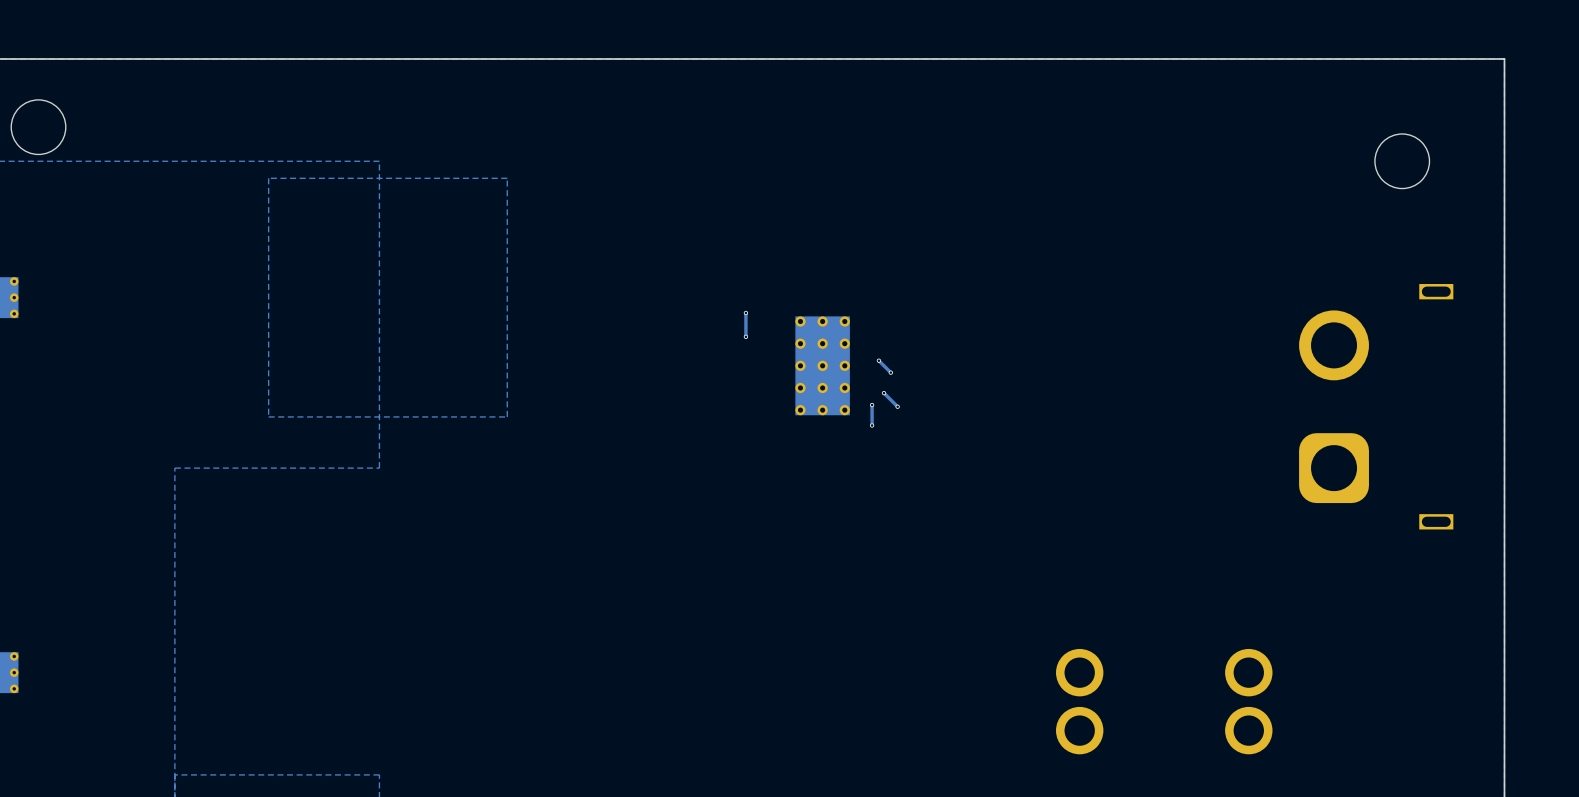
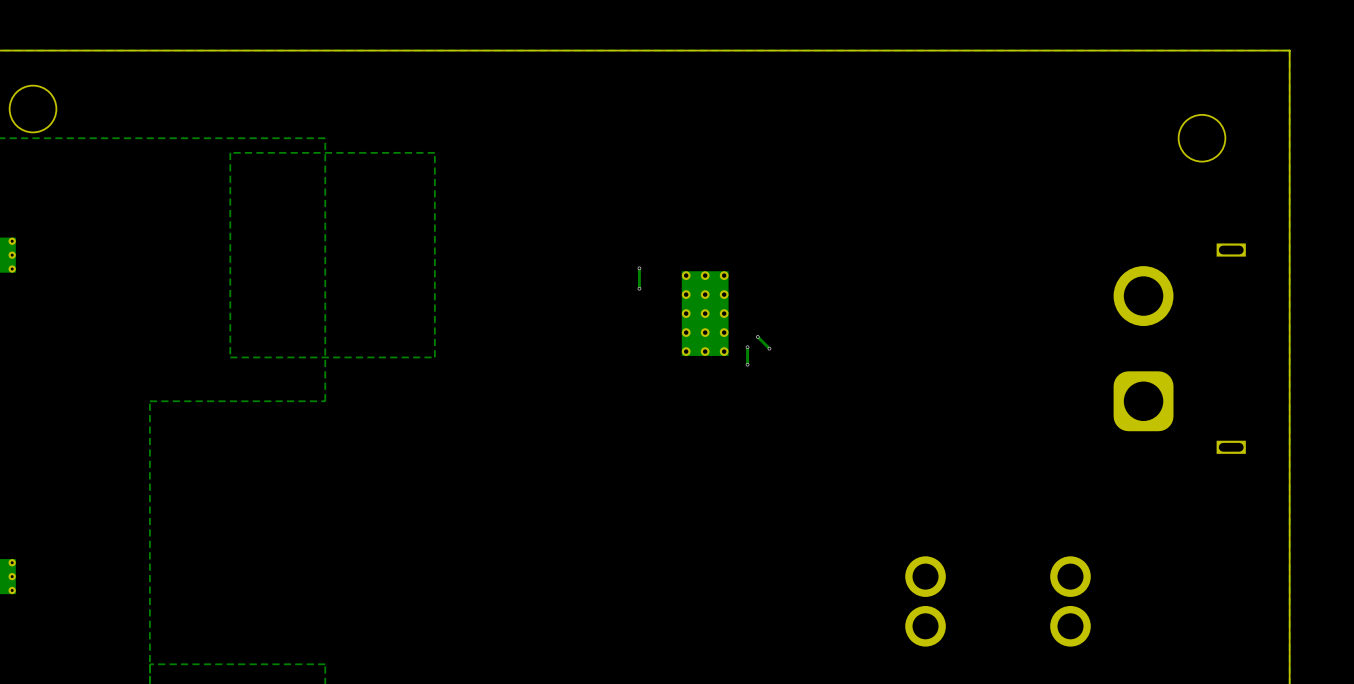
track: (878, 360) (890, 372) -> none
via: (878, 360) -> none
via: (890, 372) -> none

